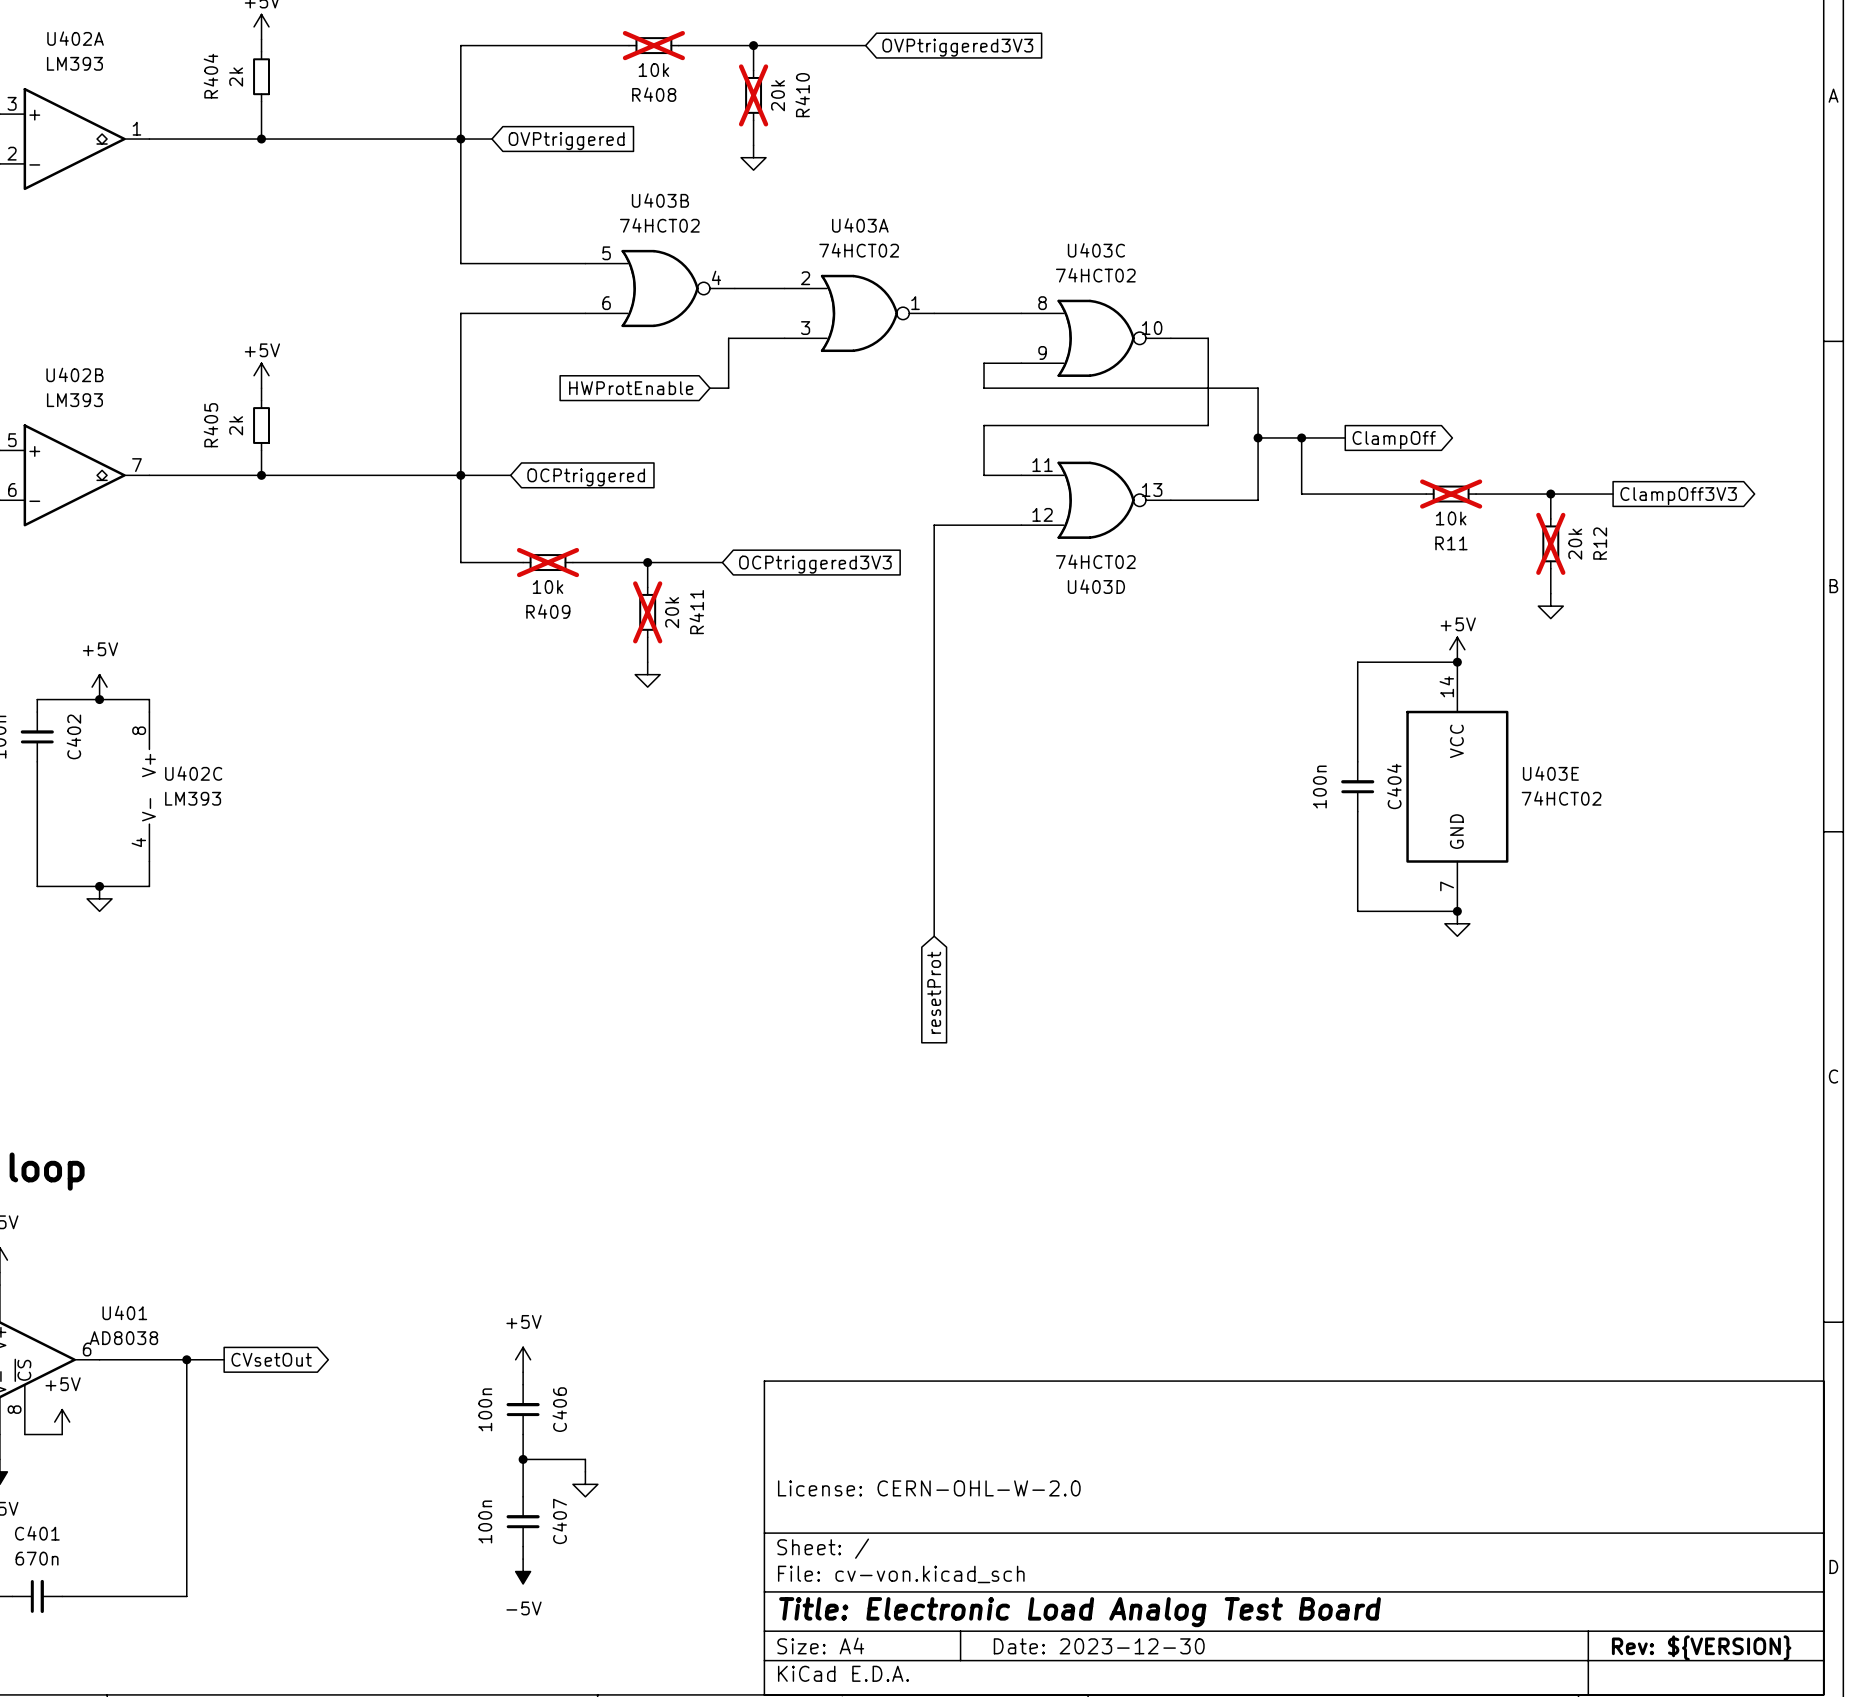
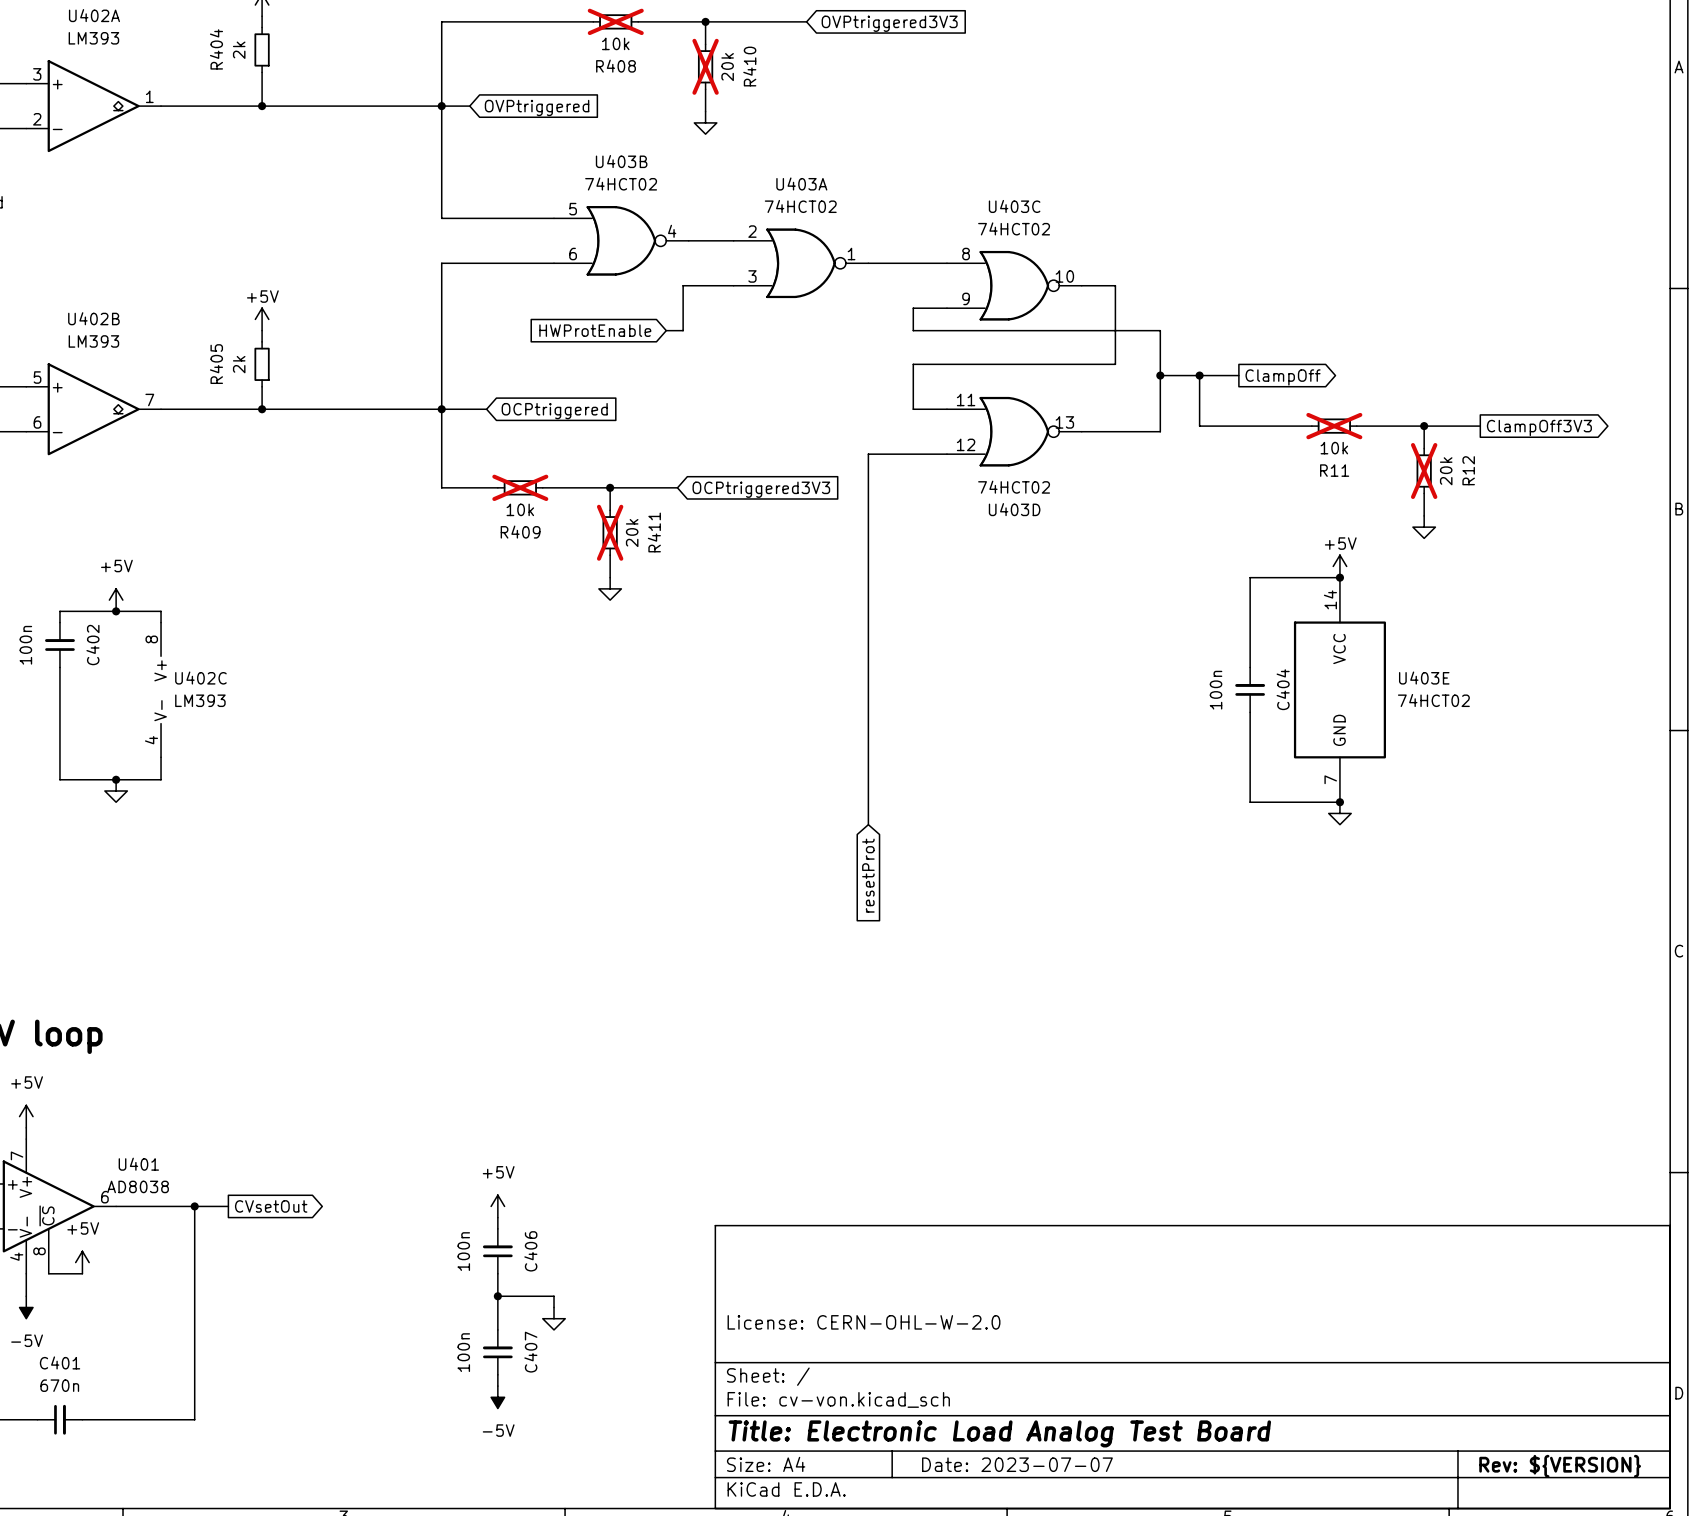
title block: Date: 2023-12-30 (1099, 1646) -> Date: 2023-07-07 (1017, 1464)

